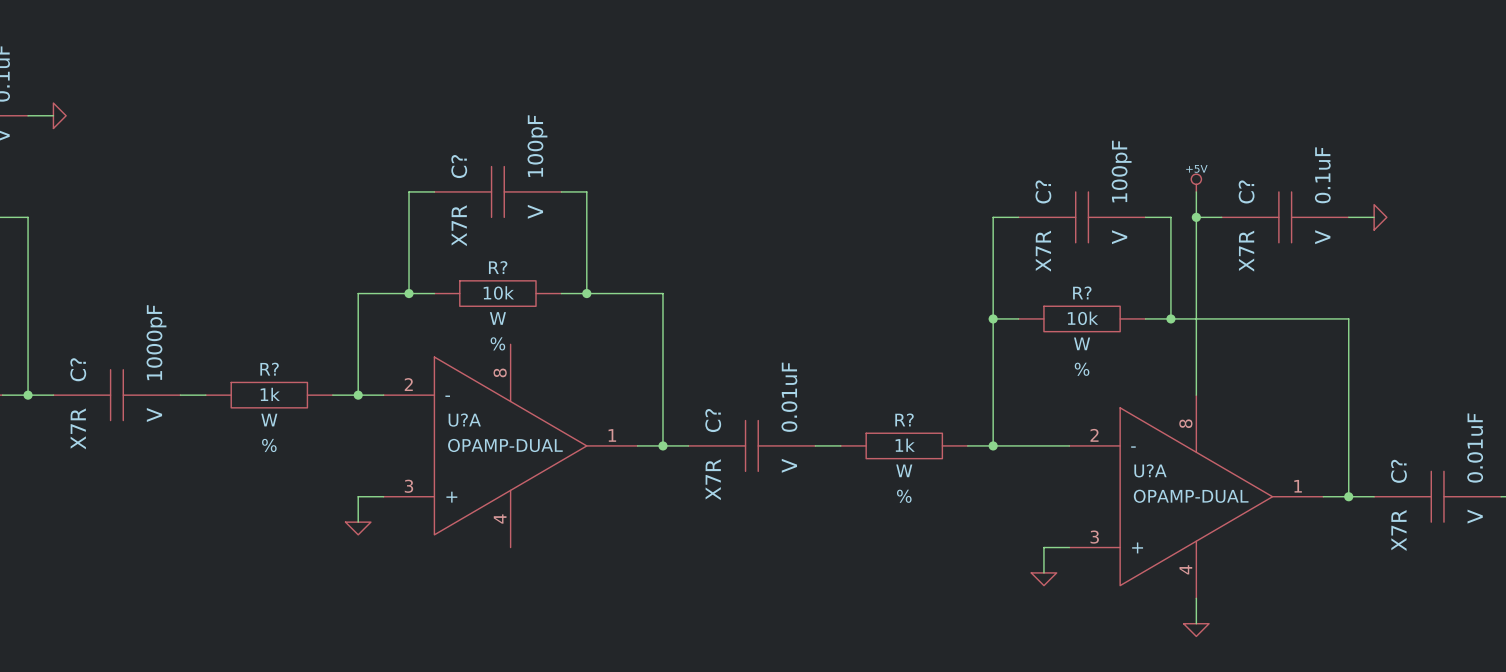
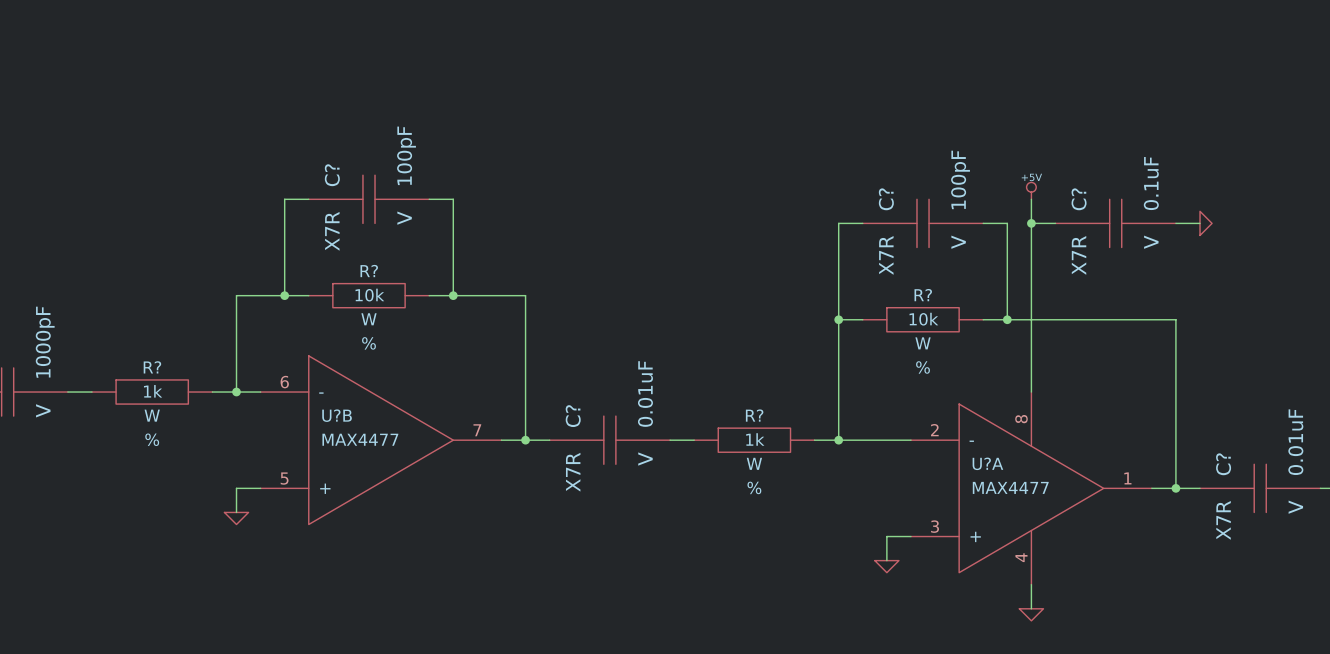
U?A: OPAMP-DUAL (510, 445) -> none
U?B: none -> MAX4477 (381, 440)
U?A value: OPAMP-DUAL (1191, 496) -> MAX4477 (1010, 487)

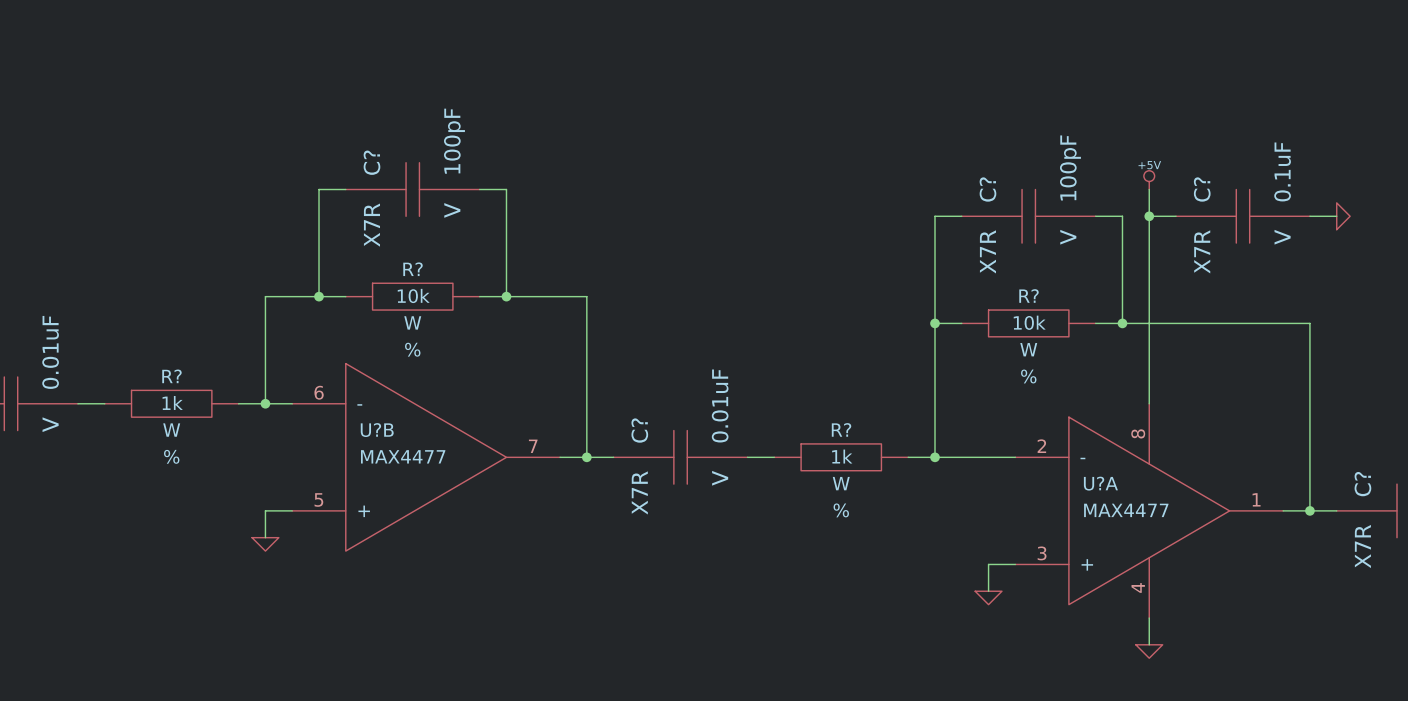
part value: 1000pF (45, 342) -> 0.01uF (50, 352)

